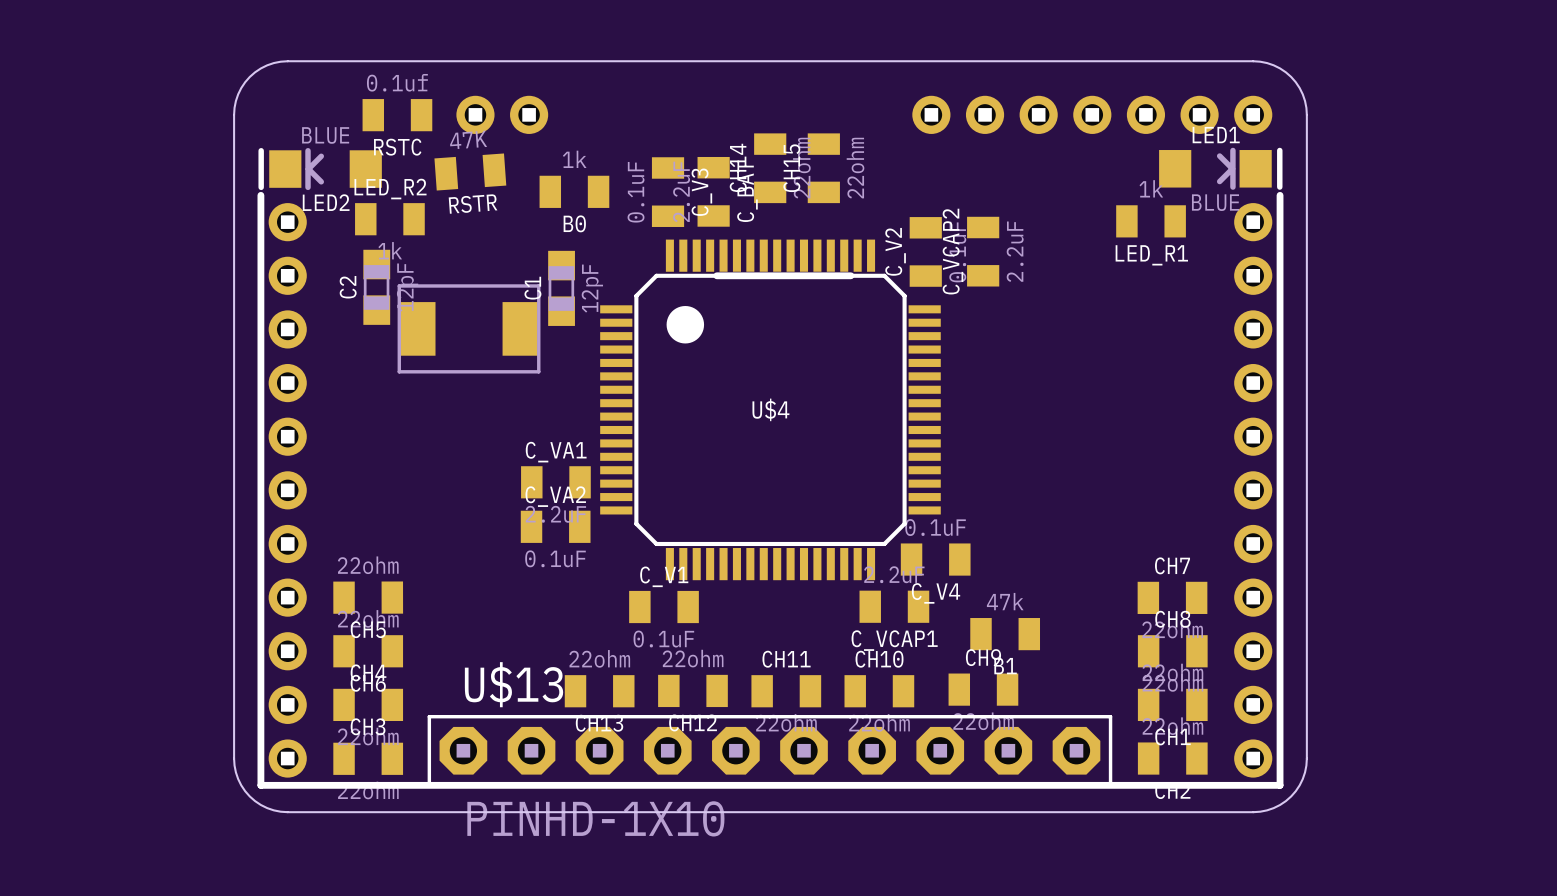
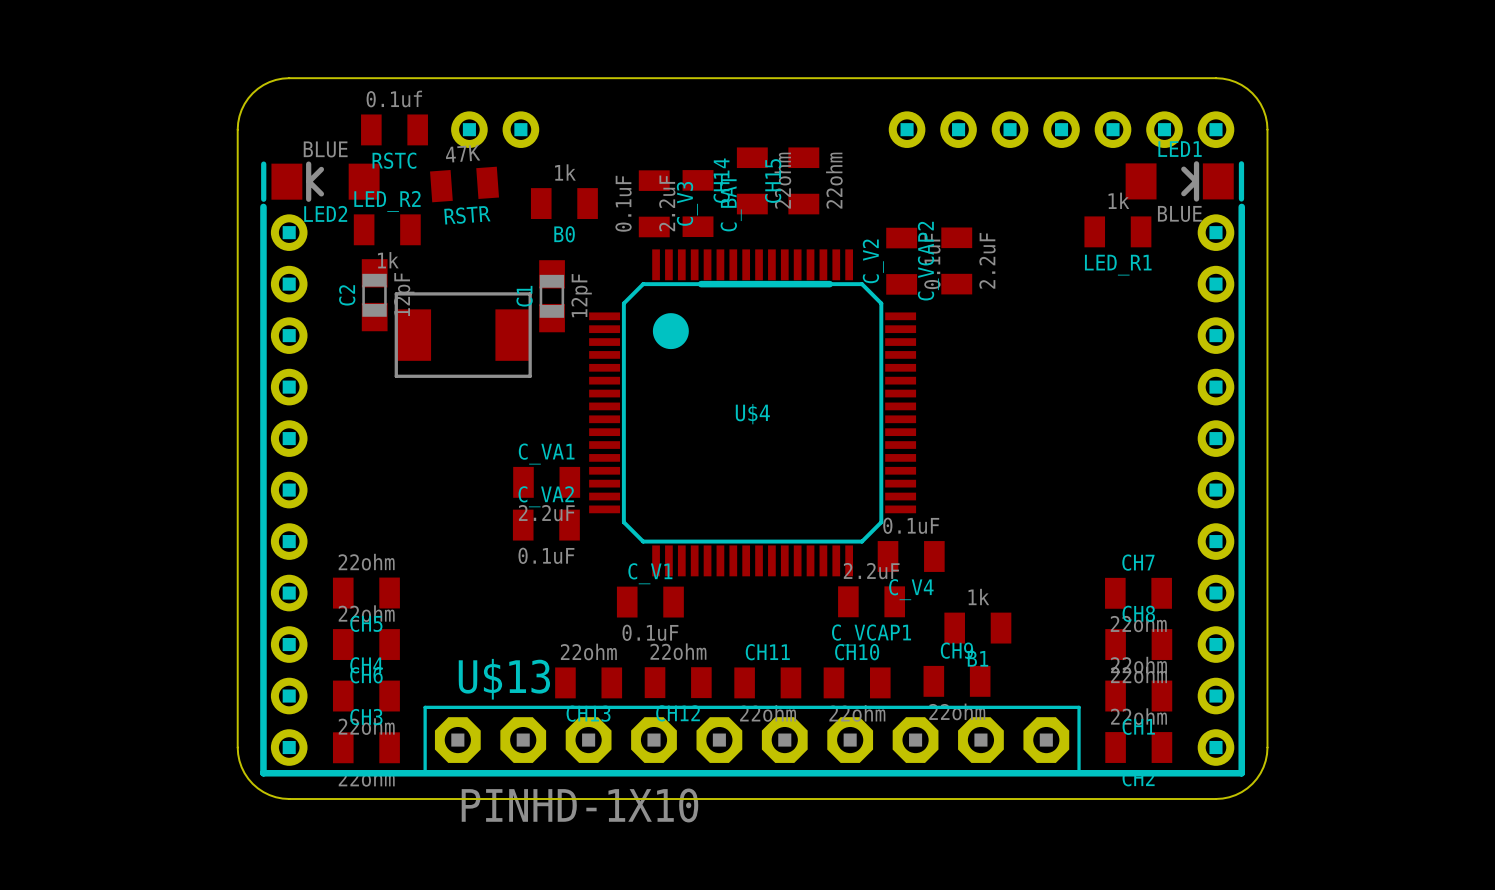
B1 value: 47k (1005, 601) -> 1k (978, 597)

